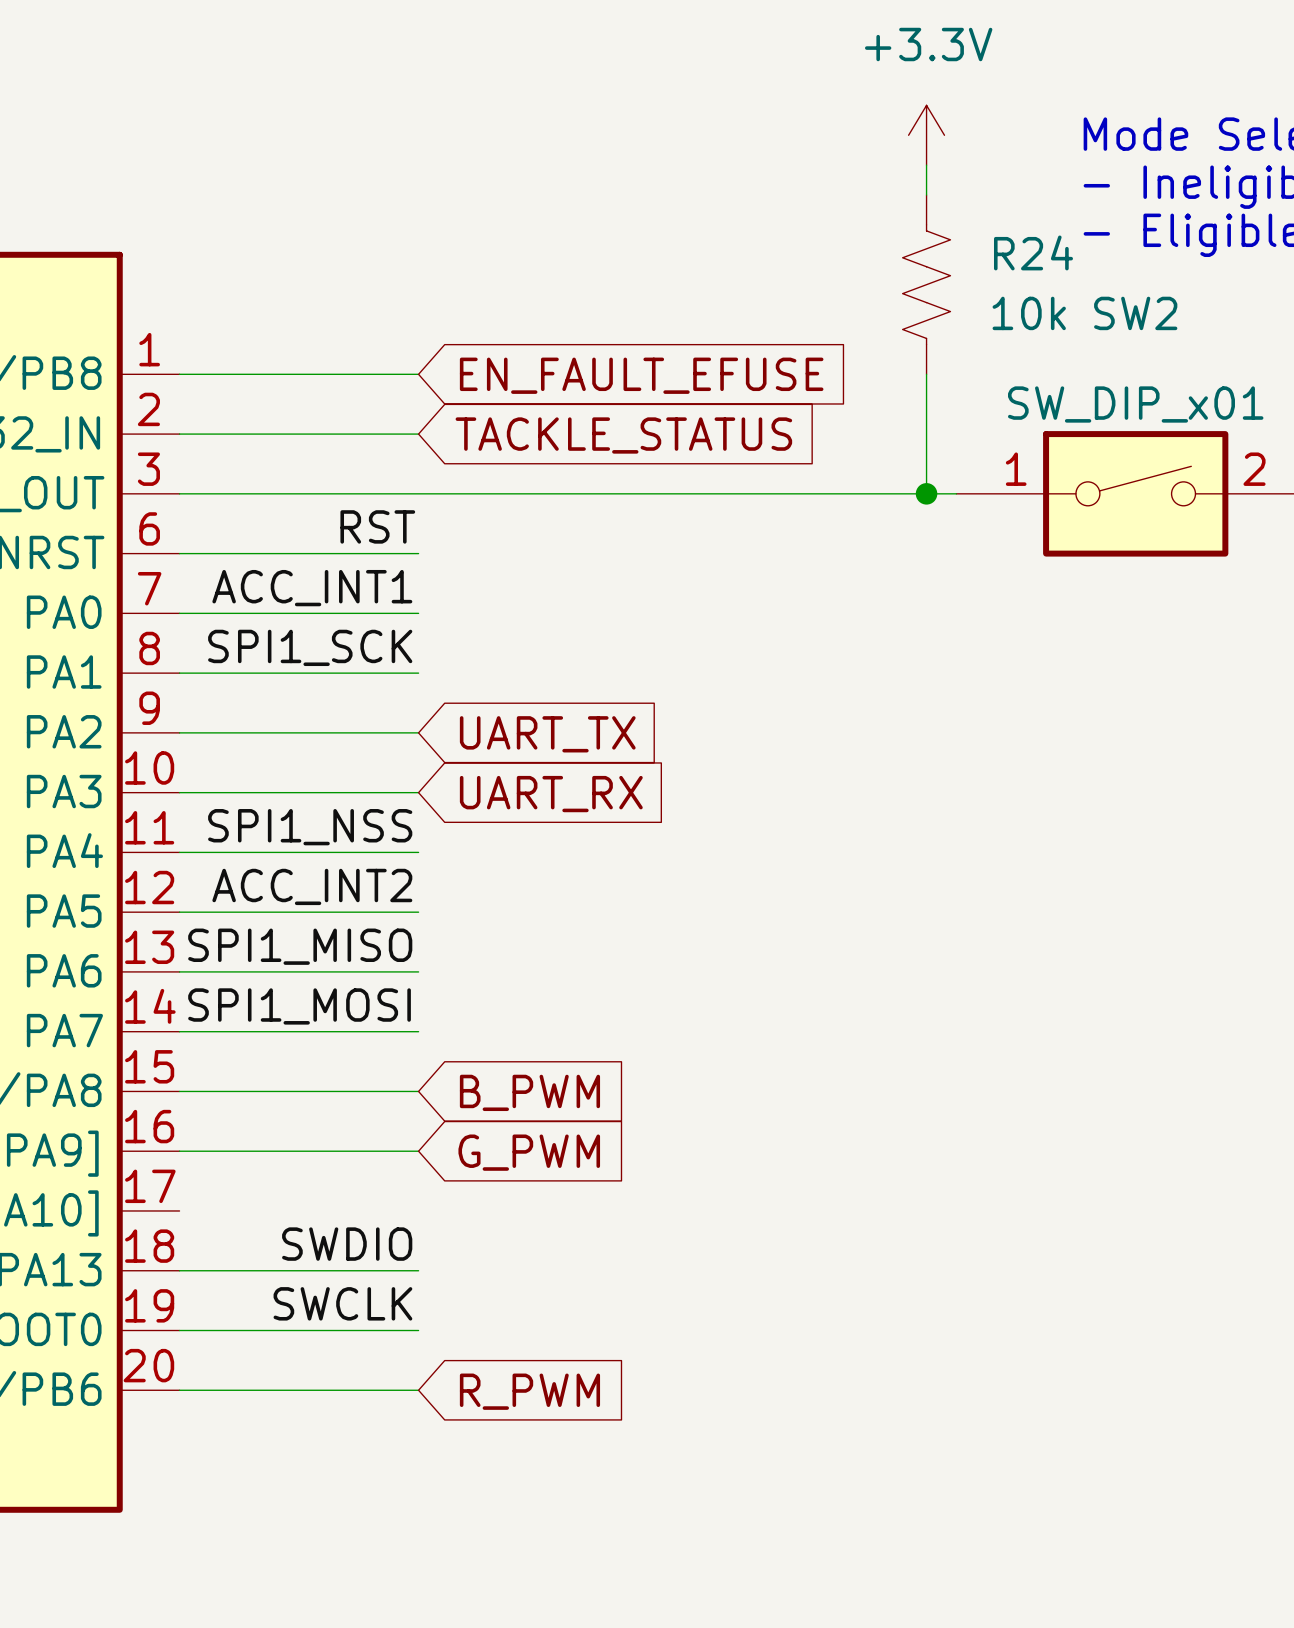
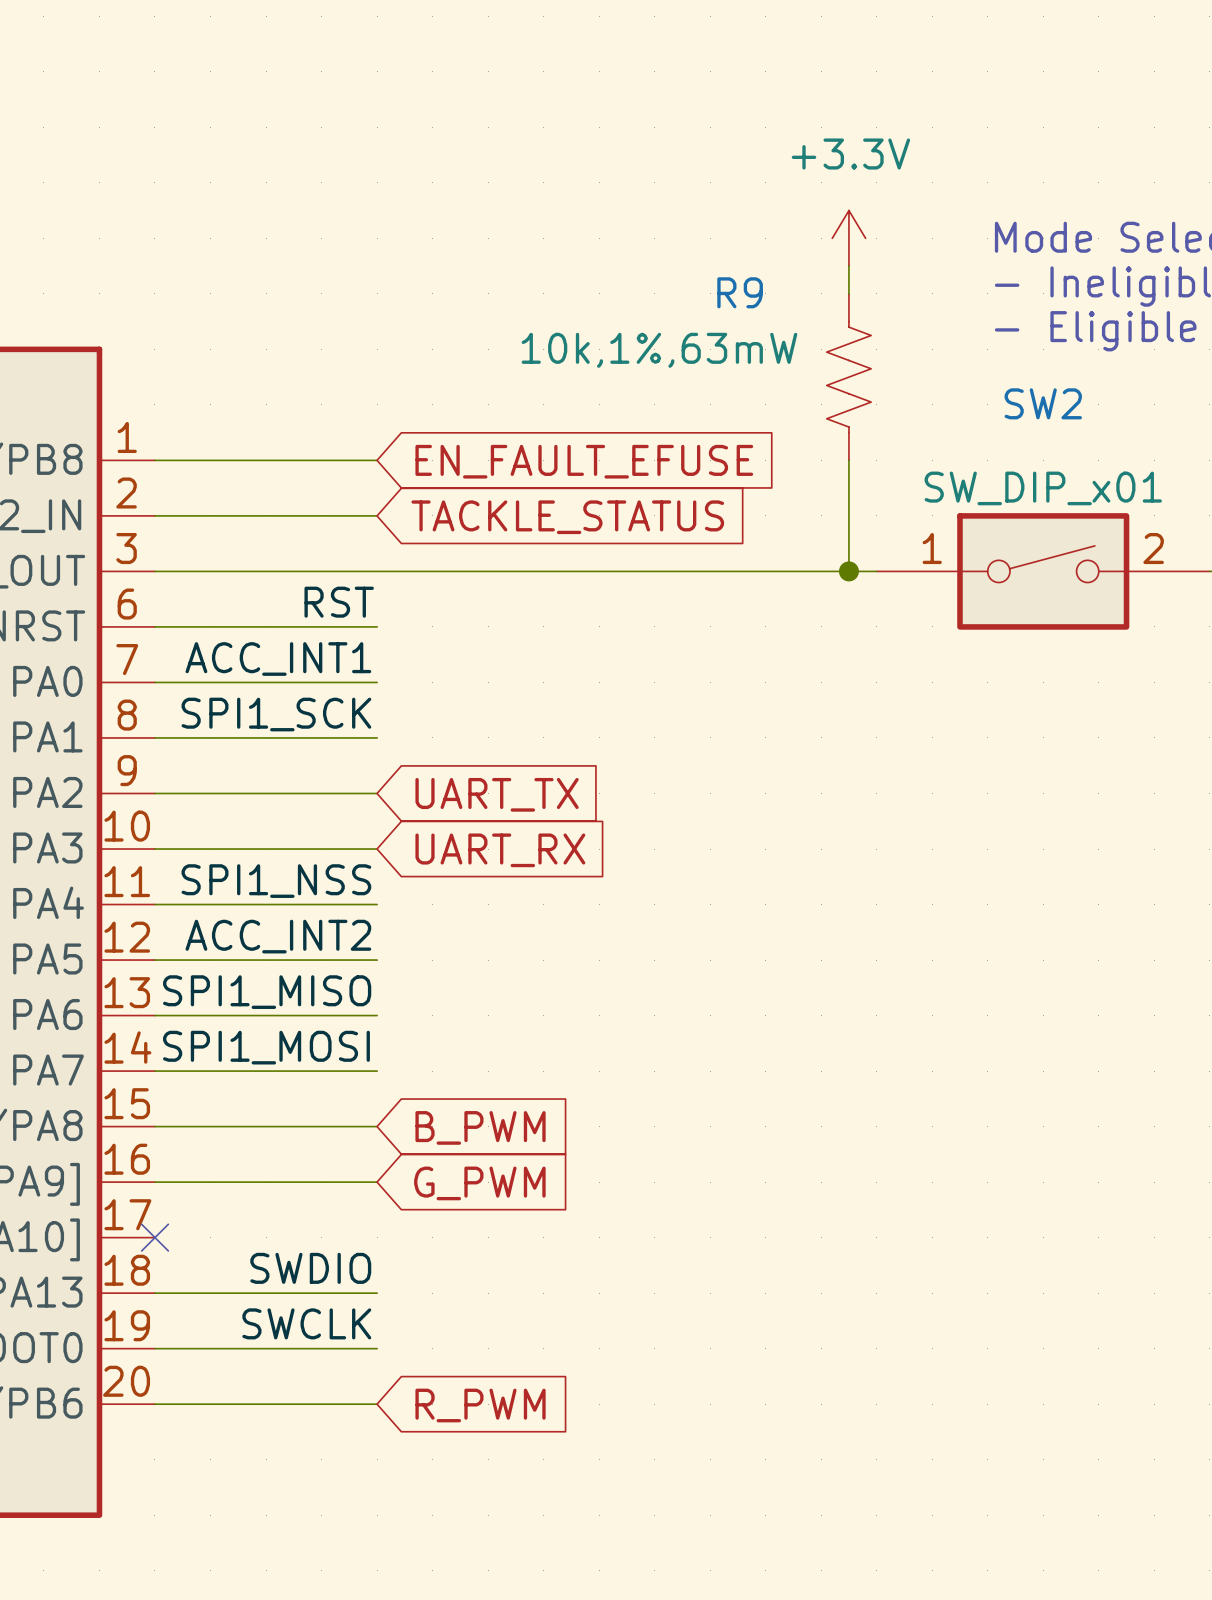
R24 name: R24 (1033, 252) -> R9 (740, 292)
R24 value: 10k (1029, 313) -> 10k,1%,63mW (659, 350)
no-connect mark: none -> (154, 1237)

